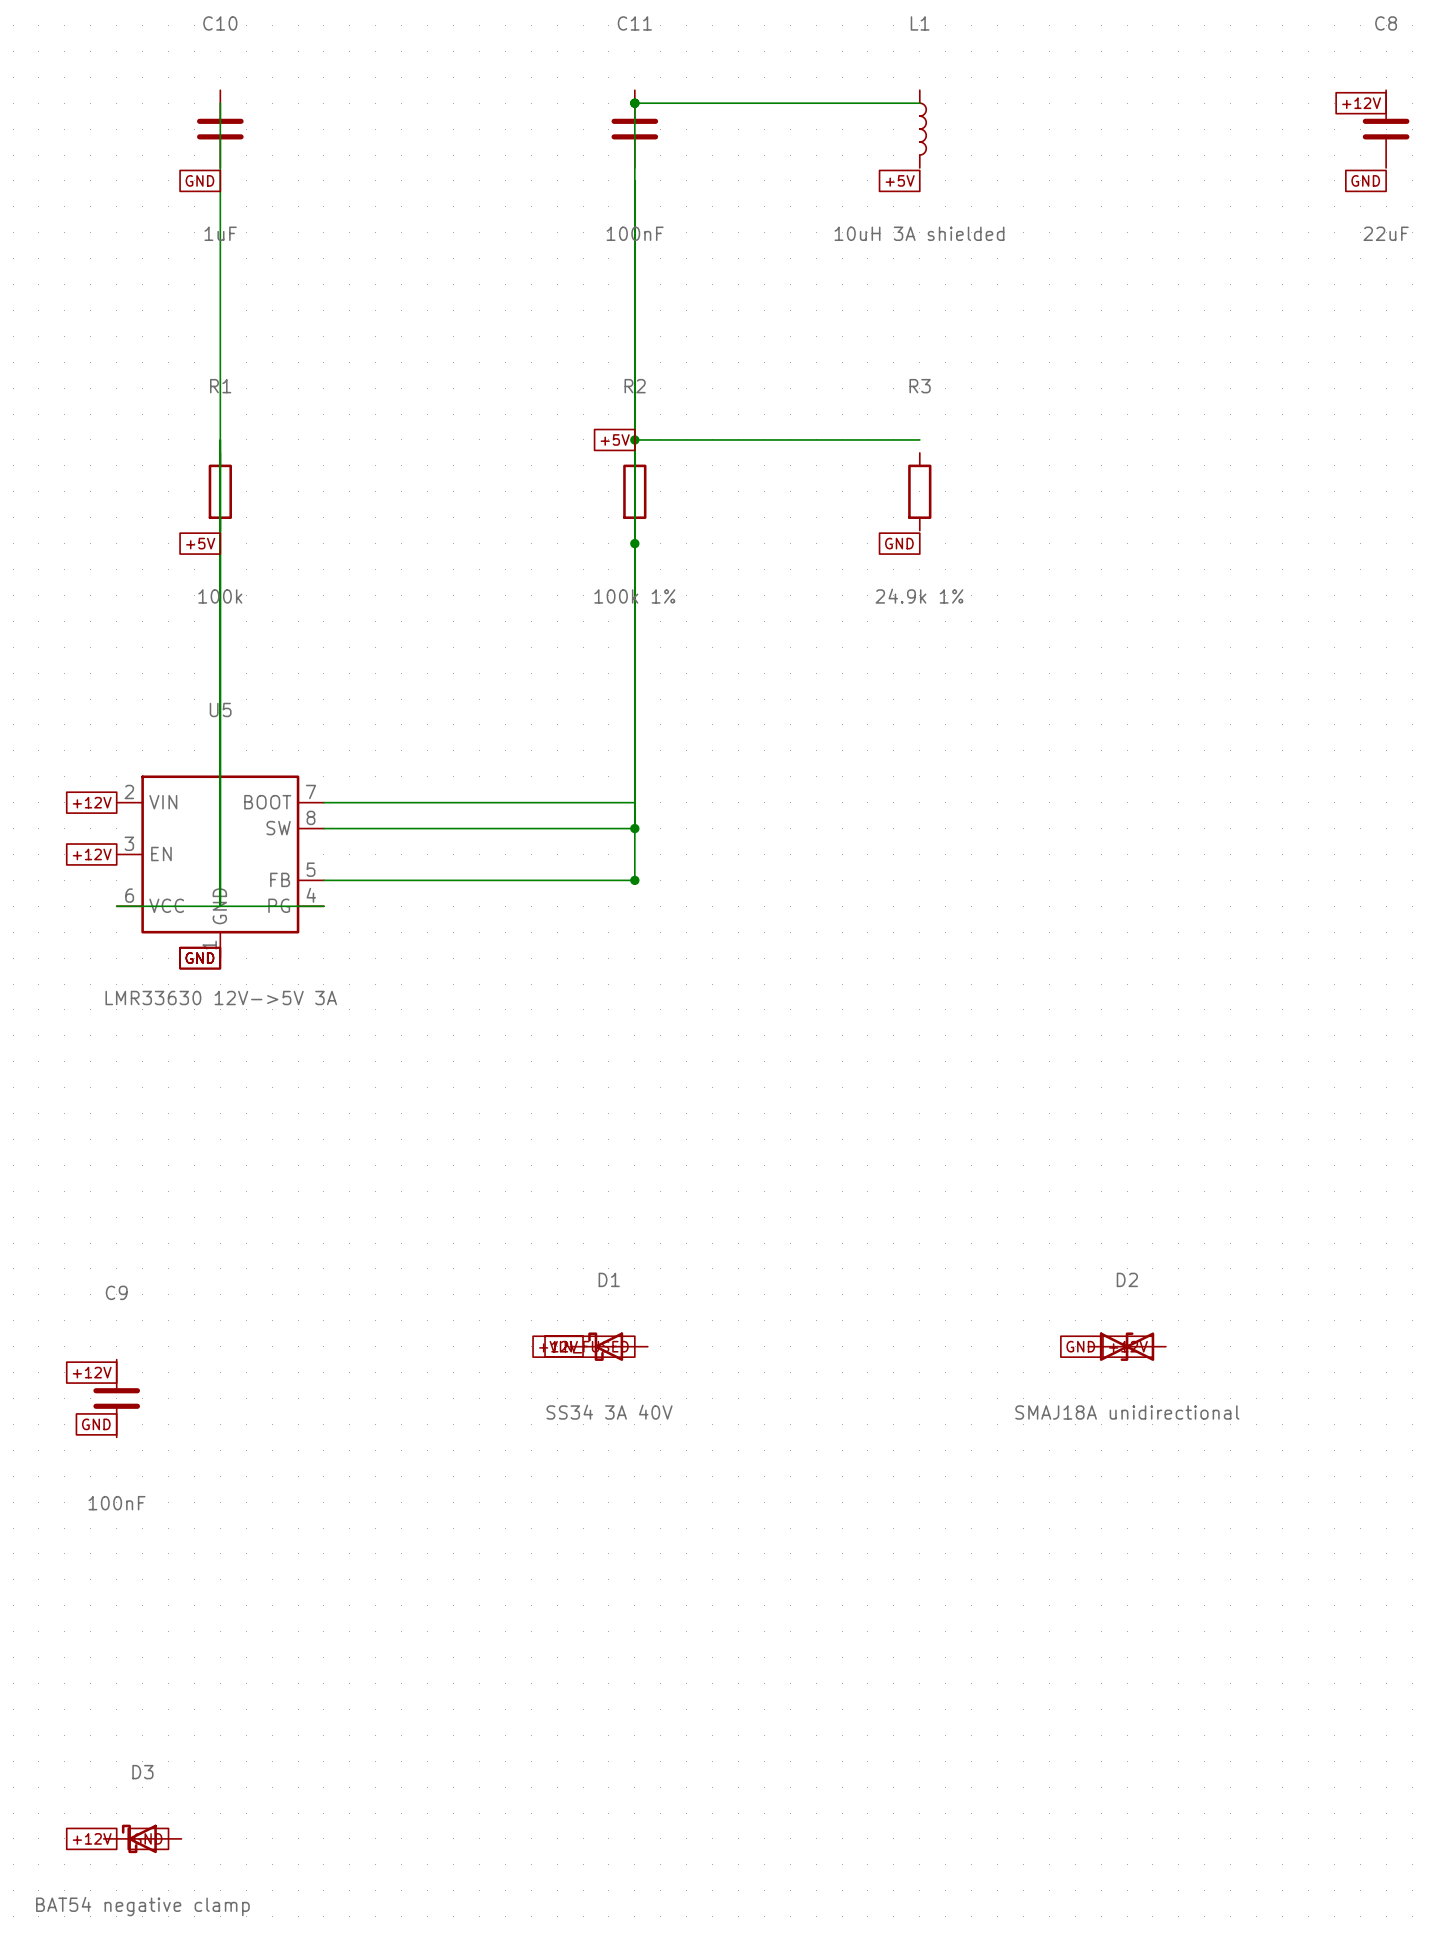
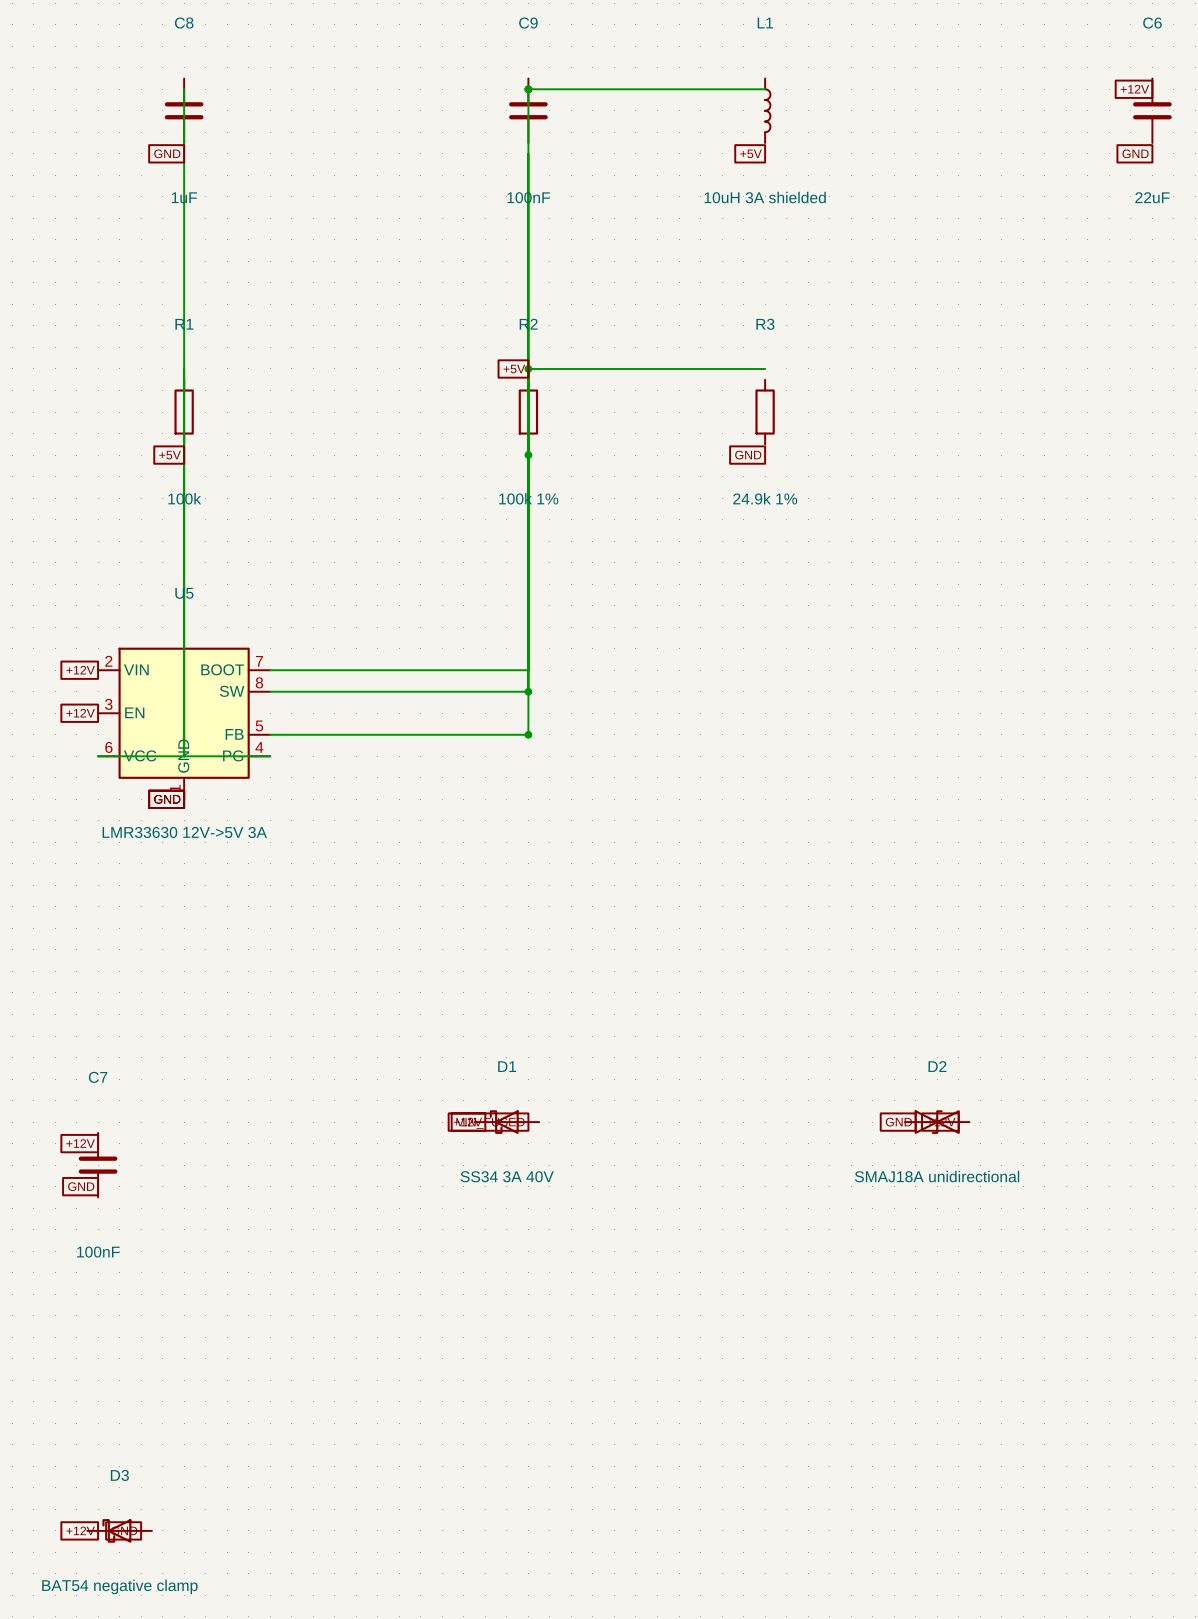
C10 name: C10 (220, 23) -> C8 (184, 23)
C11 name: C11 (634, 23) -> C9 (528, 23)
C8 name: C8 (1386, 23) -> C6 (1152, 23)
C9 name: C9 (116, 1292) -> C7 (98, 1077)

